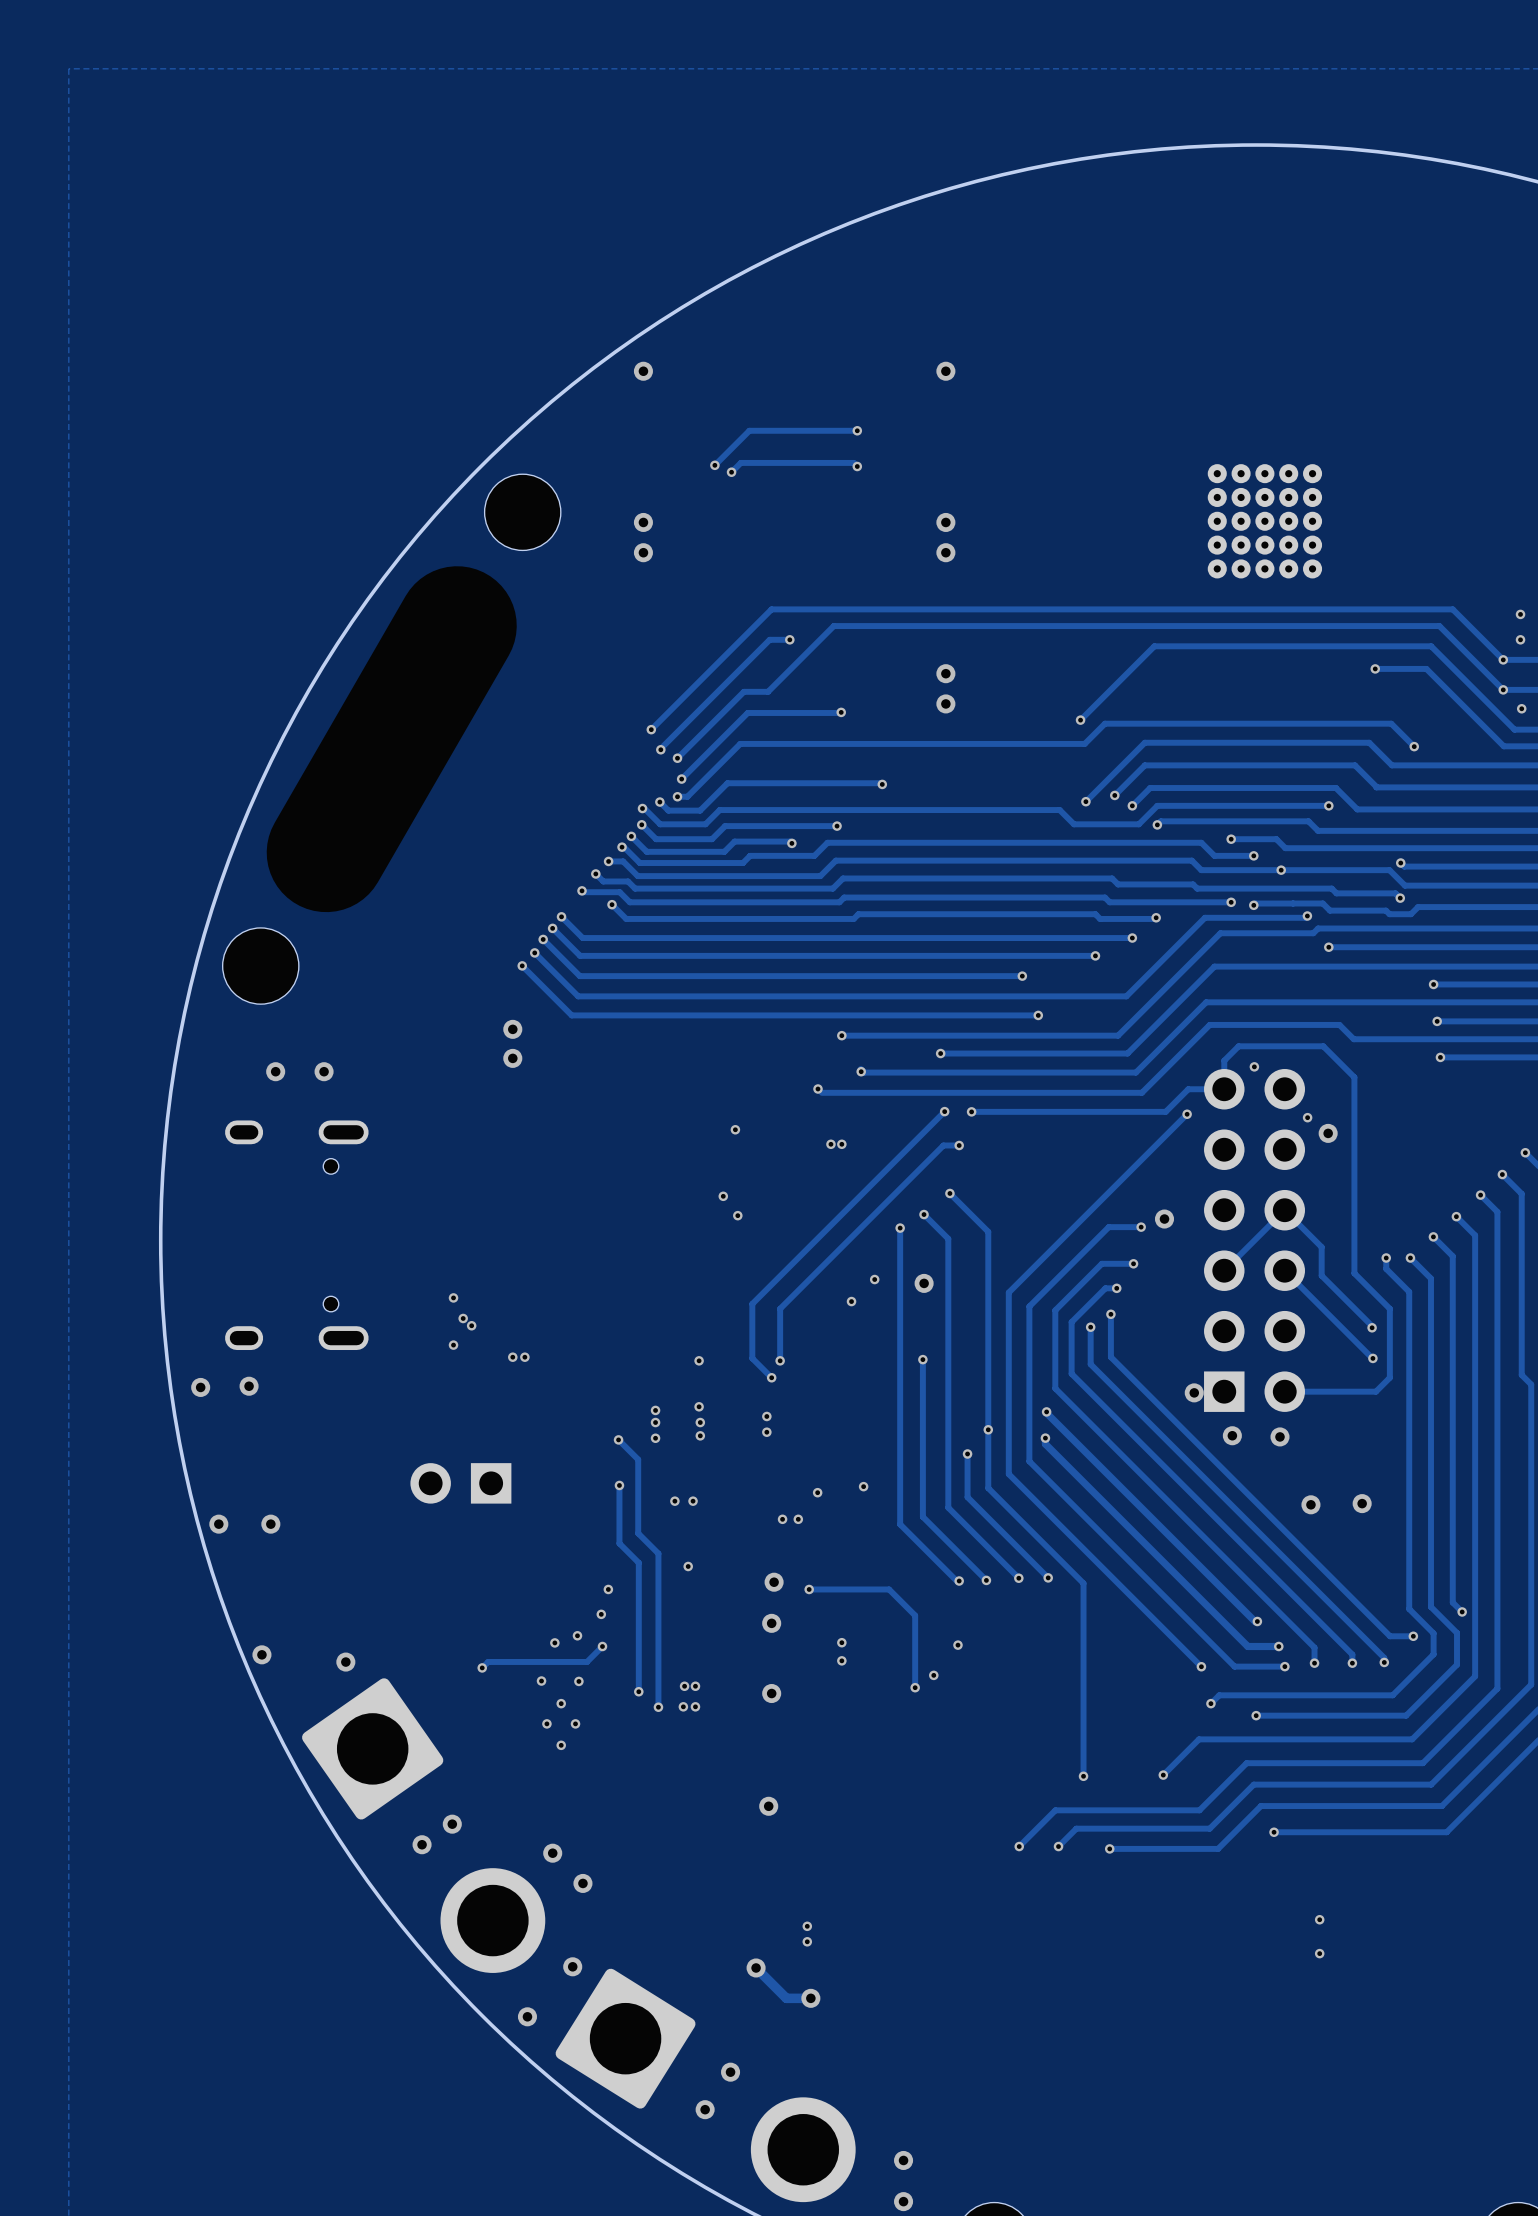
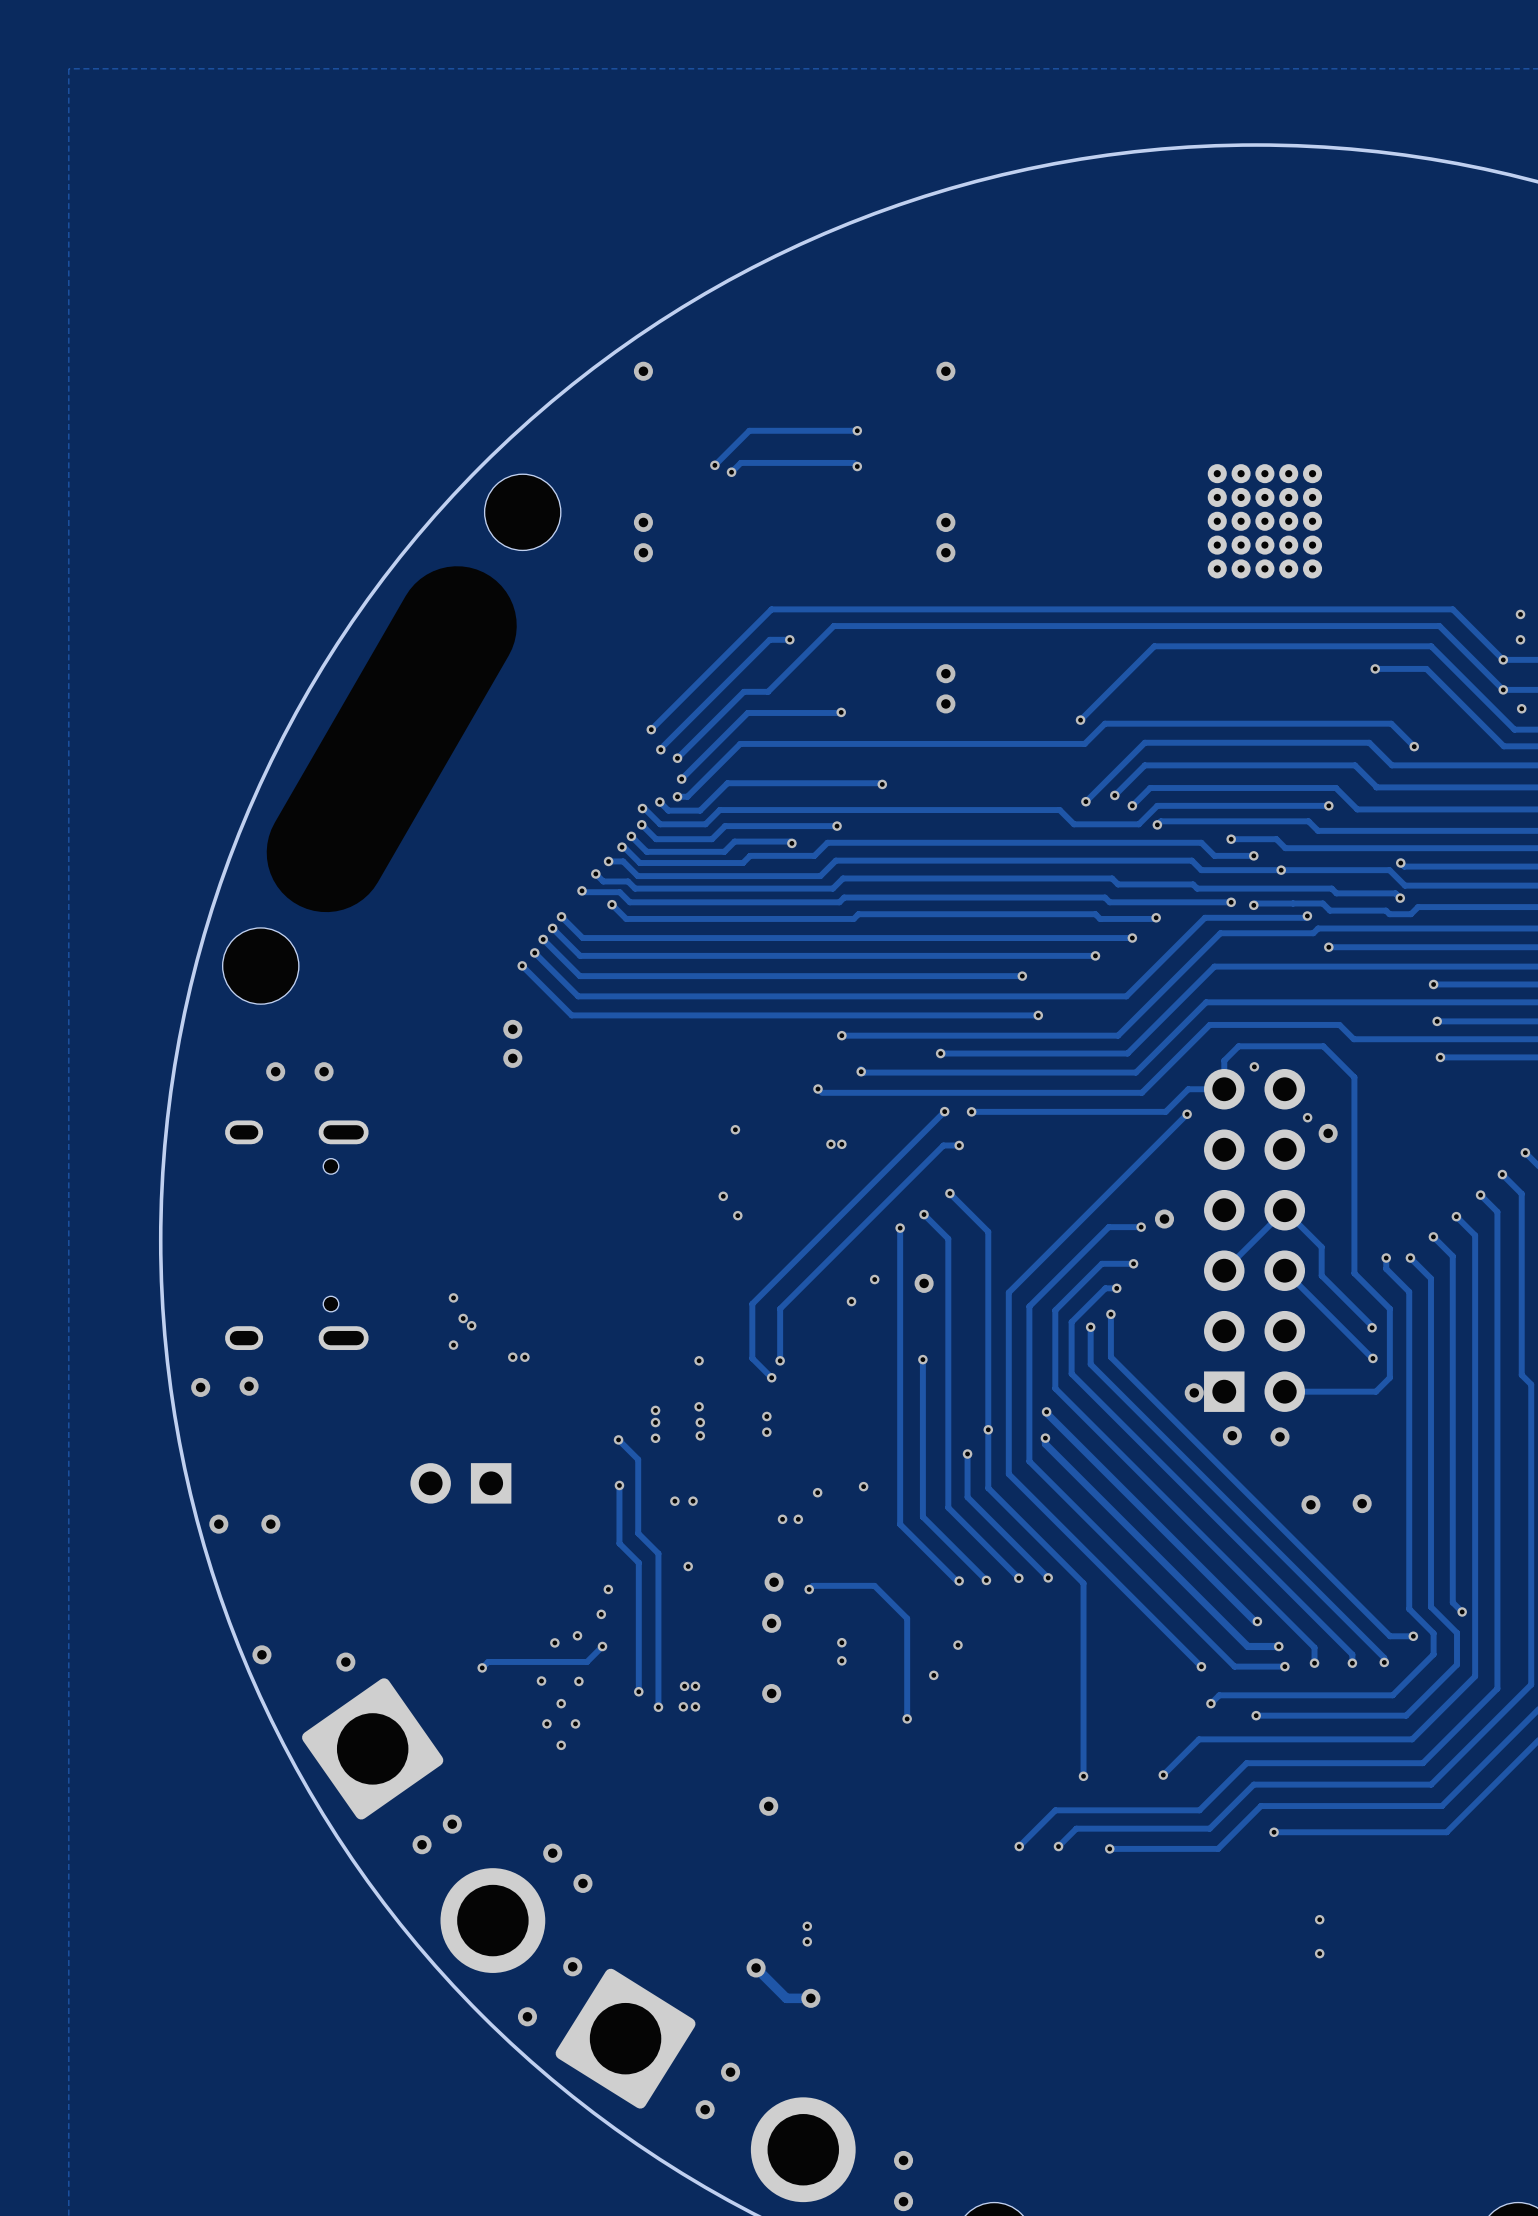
track: (809, 1589) (889, 1589) (915, 1615) (915, 1687) -> (809, 1589) (812, 1585) (874, 1585) (907, 1618) (907, 1718)
via position: (915, 1687) -> (907, 1718)

